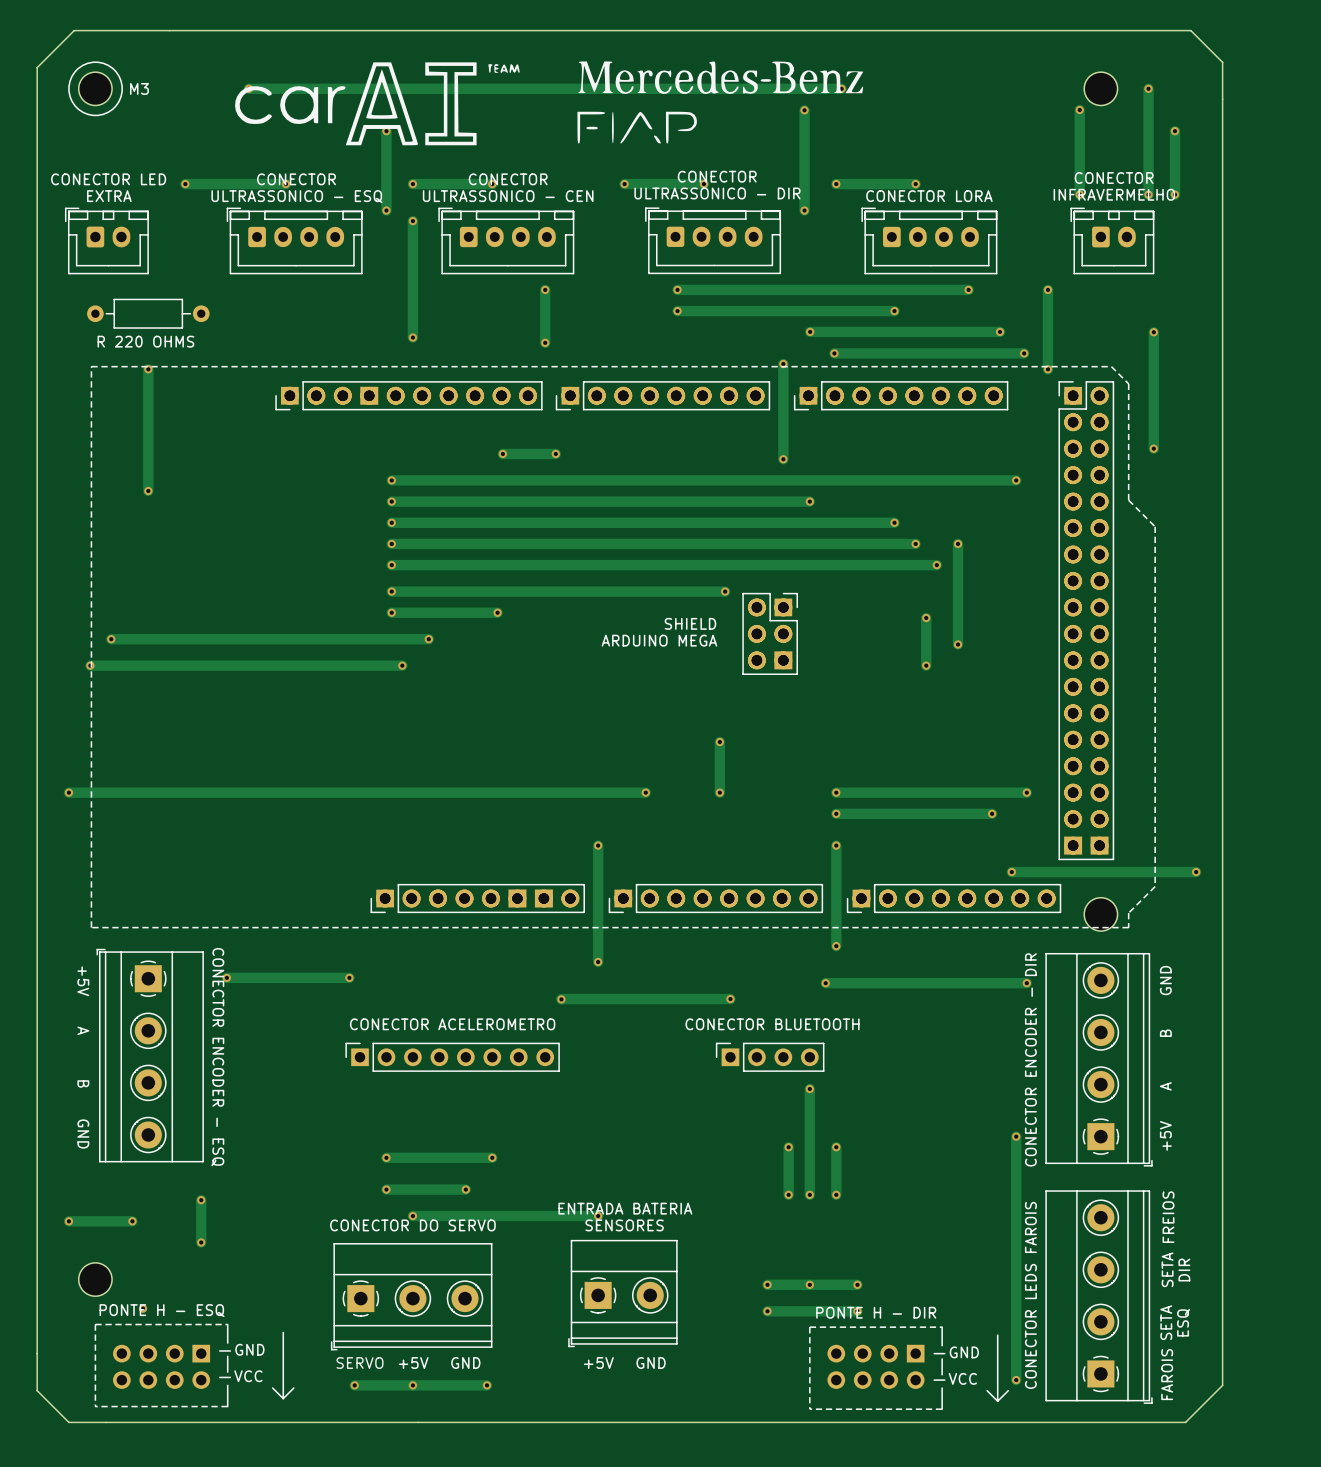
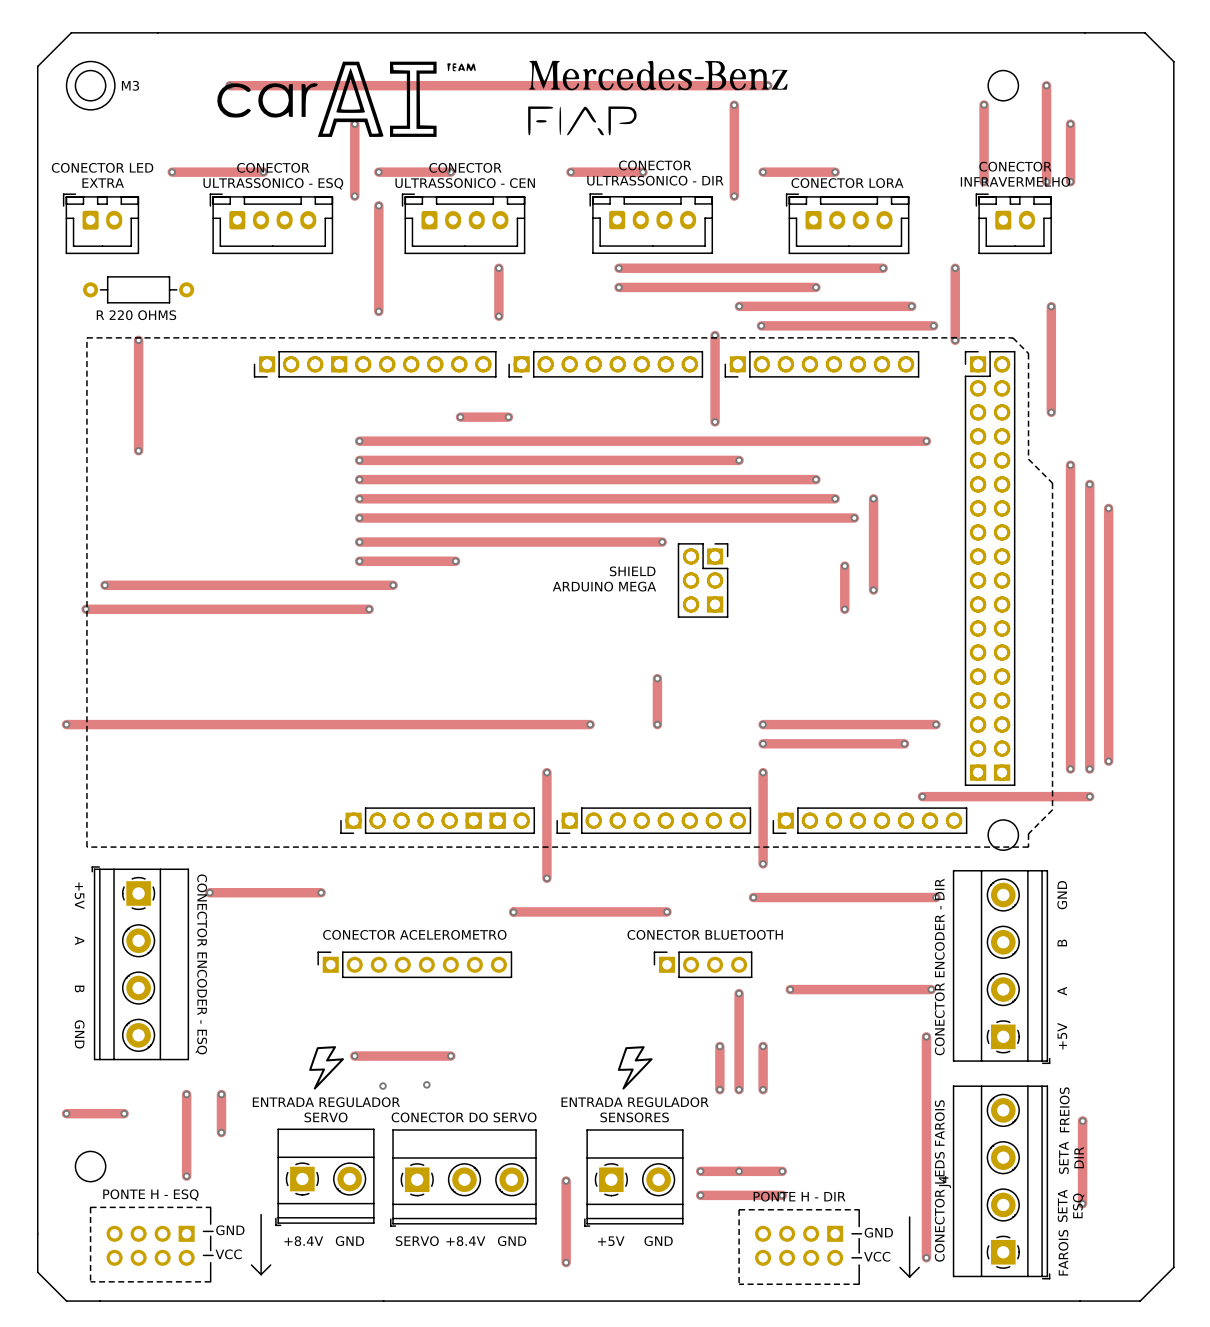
board edge: (1190, 30) (1222, 62) (1222, 1385) (1185, 1422) (68, 1422) (37, 1390) -> (1084, 32) (1145, 32) (1173, 61) (1173, 1267) (1140, 1301) (66, 1301) (37, 1272) (37, 1267)
track: none -> (1070, 465) (1070, 769)
via: none -> (1070, 465)
track: none -> (1089, 484) (1089, 769)
via: none -> (1089, 484)
track: none -> (1108, 508) (1108, 761)
via: none -> (1108, 508)
via: none -> (1108, 761)
via: none -> (1070, 769)
via: none -> (1089, 769)
track: none -> (790, 989) (931, 989)
via: none -> (790, 989)
via: none -> (931, 989)
drawing: none -> [309, 1046, 344, 1090]
drawing: none -> [617, 1046, 653, 1090]
track: (386, 1189) (465, 1189) -> none
via: (386, 1189) -> none
via: none -> (383, 1086)
track: none -> (221, 1094) (221, 1132)
via: none -> (221, 1094)
text: none -> ENTRADA REGULADOR (326, 1102)
text: ENTRADA BATERIA (625, 1208) -> ENTRADA REGULADOR (635, 1102)
track: (412, 1216) (598, 1216) -> none
via: (412, 1216) -> none
via: (598, 1216) -> none
text: none -> SERVO (326, 1117)
text position: CONECTOR DO SERVO (412, 1225) -> CONECTOR DO SERVO (464, 1117)
text position: SENSORES (624, 1225) -> SENSORES (634, 1117)
track: none -> (1082, 1121) (1082, 1203)
via: none -> (1082, 1121)
track: none -> (186, 1132) (186, 1176)
via: (201, 1242) -> none
via: none -> (221, 1132)
via: none -> (186, 1176)
part: none -> (324, 1177)
part position: (622, 1293) -> (633, 1178)
track: none -> (566, 1180) (566, 1262)
via: none -> (566, 1180)
J4 name: none -> J4 (945, 1182)
part position: (411, 1296) -> (463, 1178)
via: (143, 1308) -> none
via: none -> (1082, 1203)
text: none -> +8.4V (303, 1241)
text: none -> GND (349, 1241)
text: none -> SERVO (417, 1241)
text: none -> +8.4V (465, 1241)
text: none -> GND (512, 1241)
text: none -> GND (658, 1241)
text: SERVO (360, 1363) -> none
text: +5V (413, 1363) -> none
text: GND (465, 1363) -> none
text position: +5V (598, 1363) -> +5V (611, 1241)
text: GND (651, 1363) -> none
track: (354, 1385) (487, 1385) -> none
via: (354, 1385) -> none
via: (412, 1385) -> none
via: (487, 1385) -> none
via: none -> (566, 1262)

